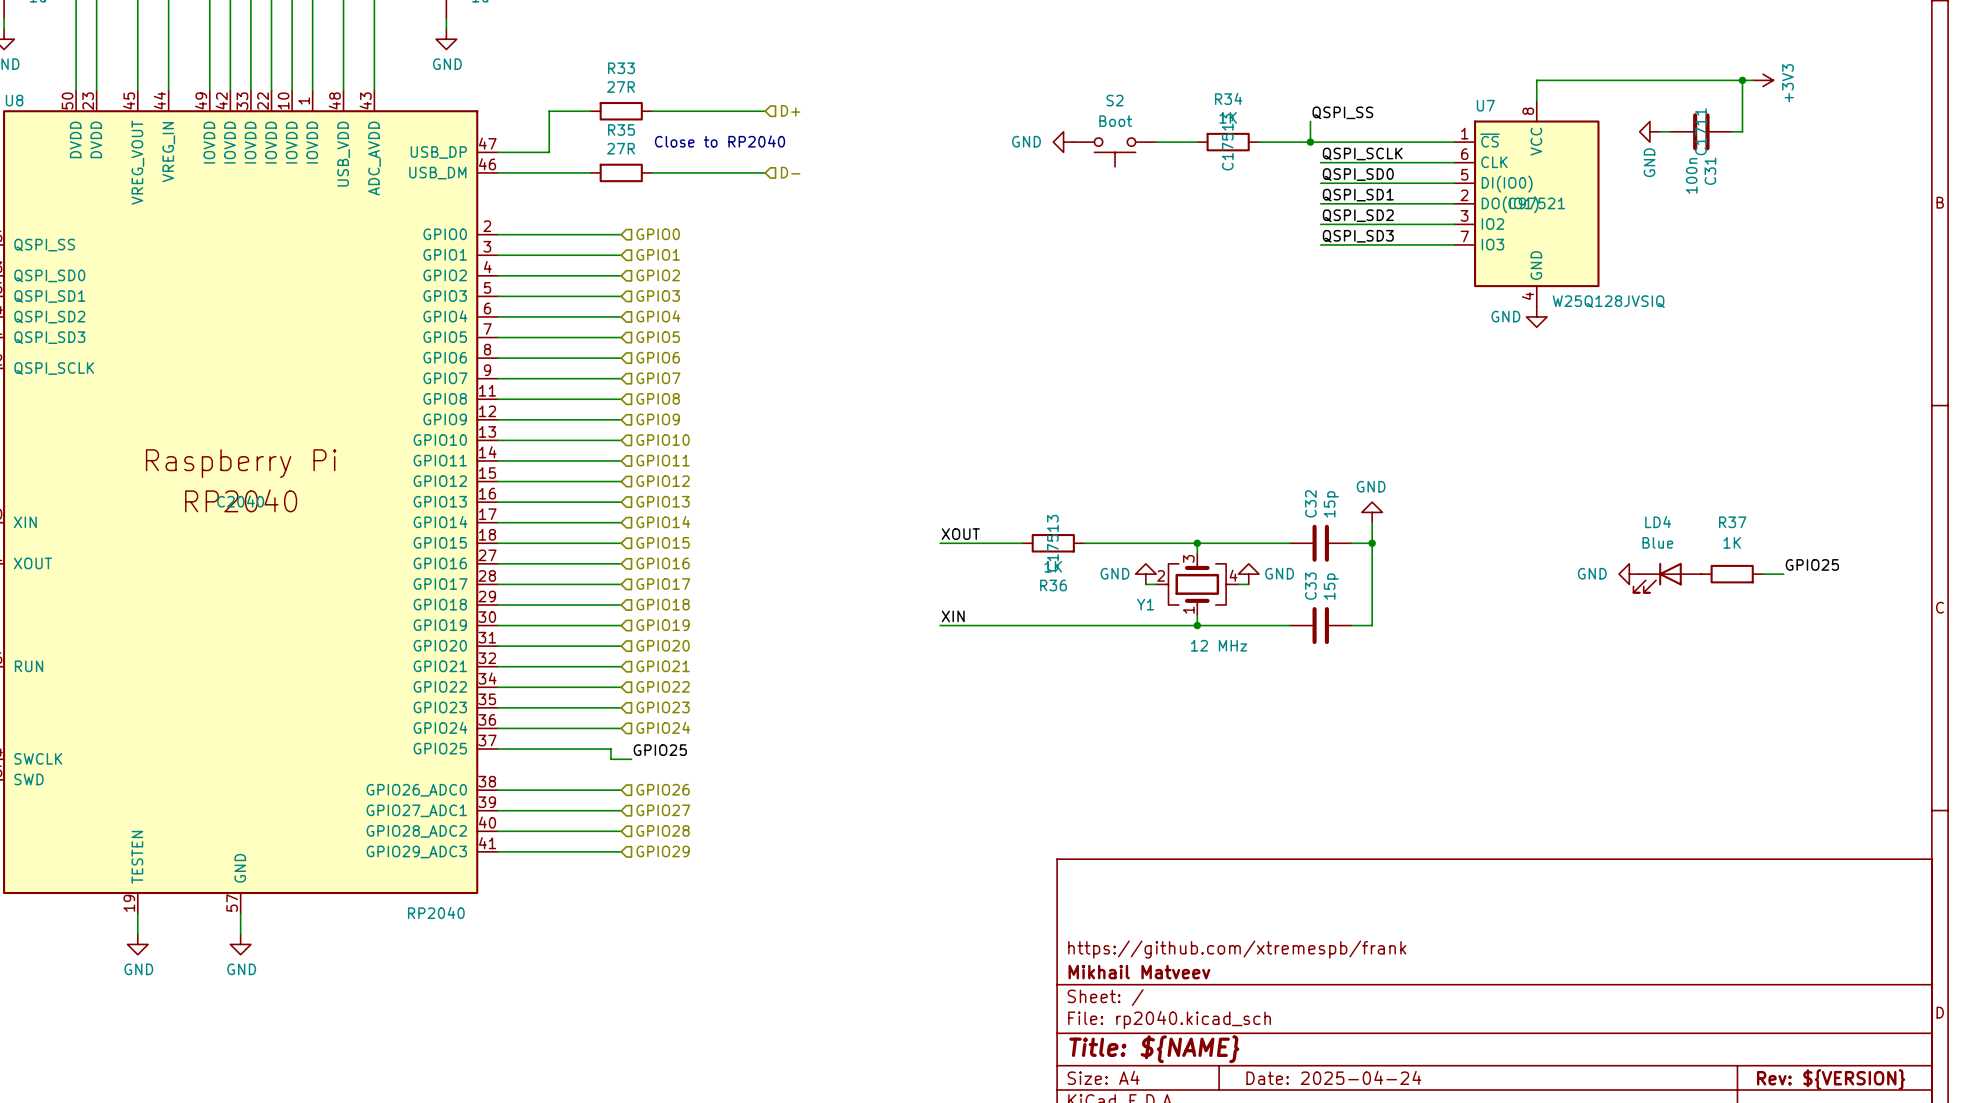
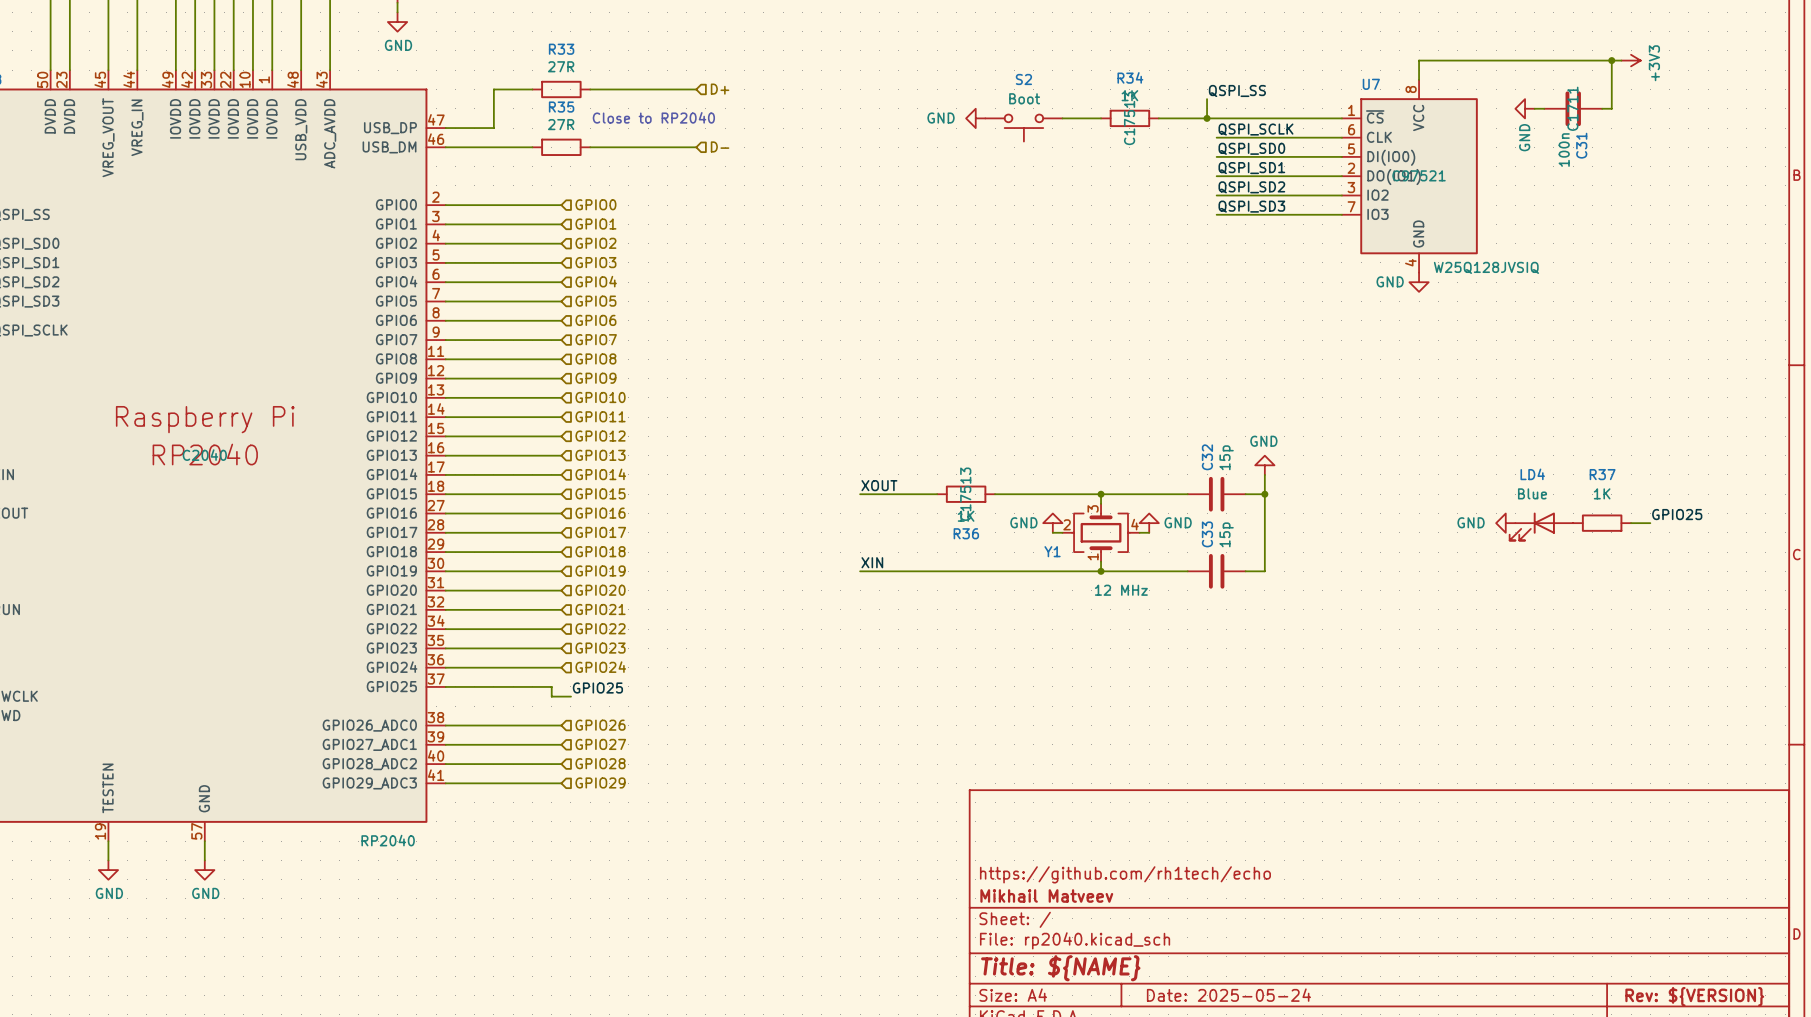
title block: https://github.com/xtremespb/frank (1237, 949) -> https://github.com/rh1tech/echo (1125, 874)
title block: Date: 2025-04-24 (1333, 1077) -> Date: 2025-05-24 (1228, 995)

